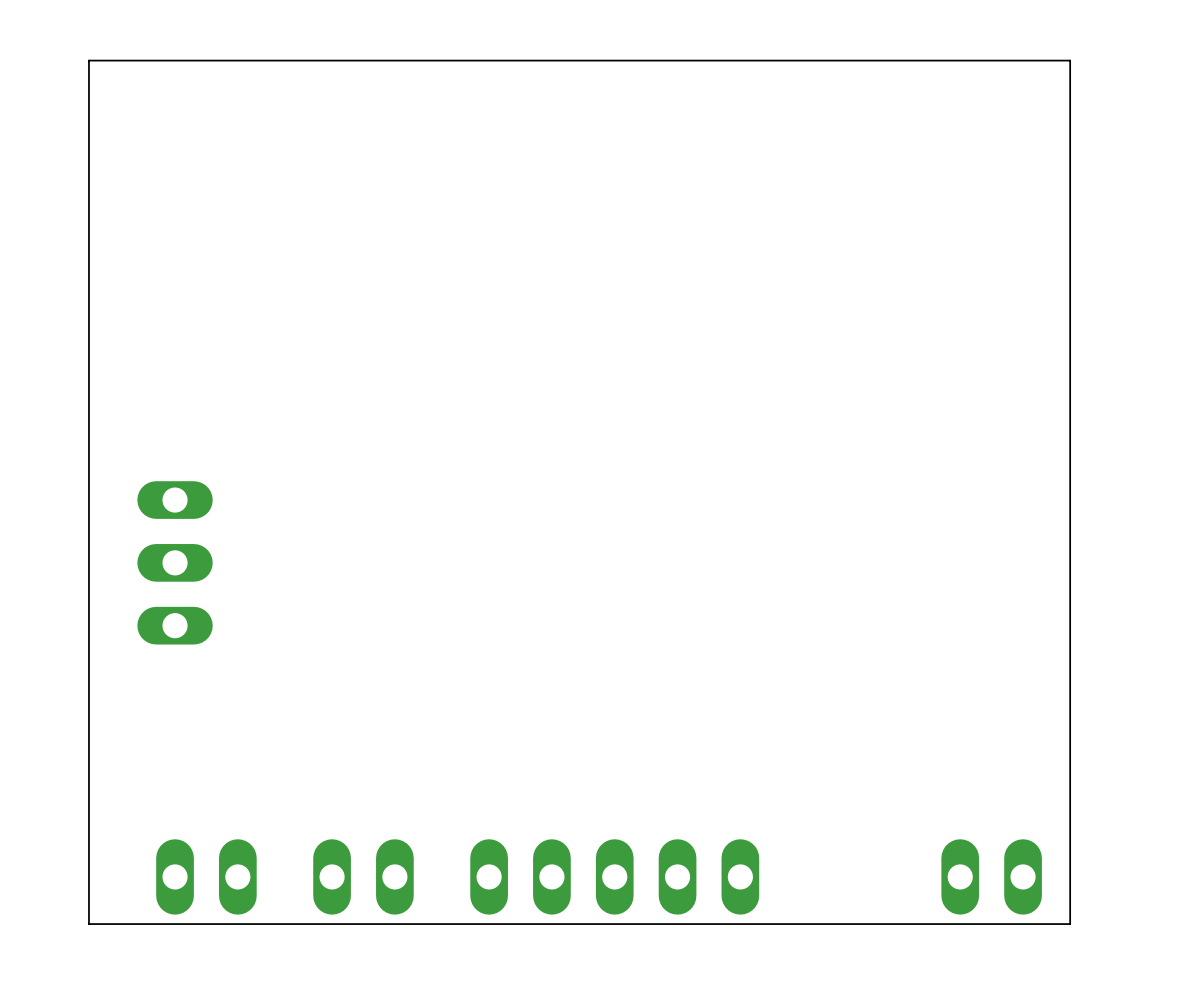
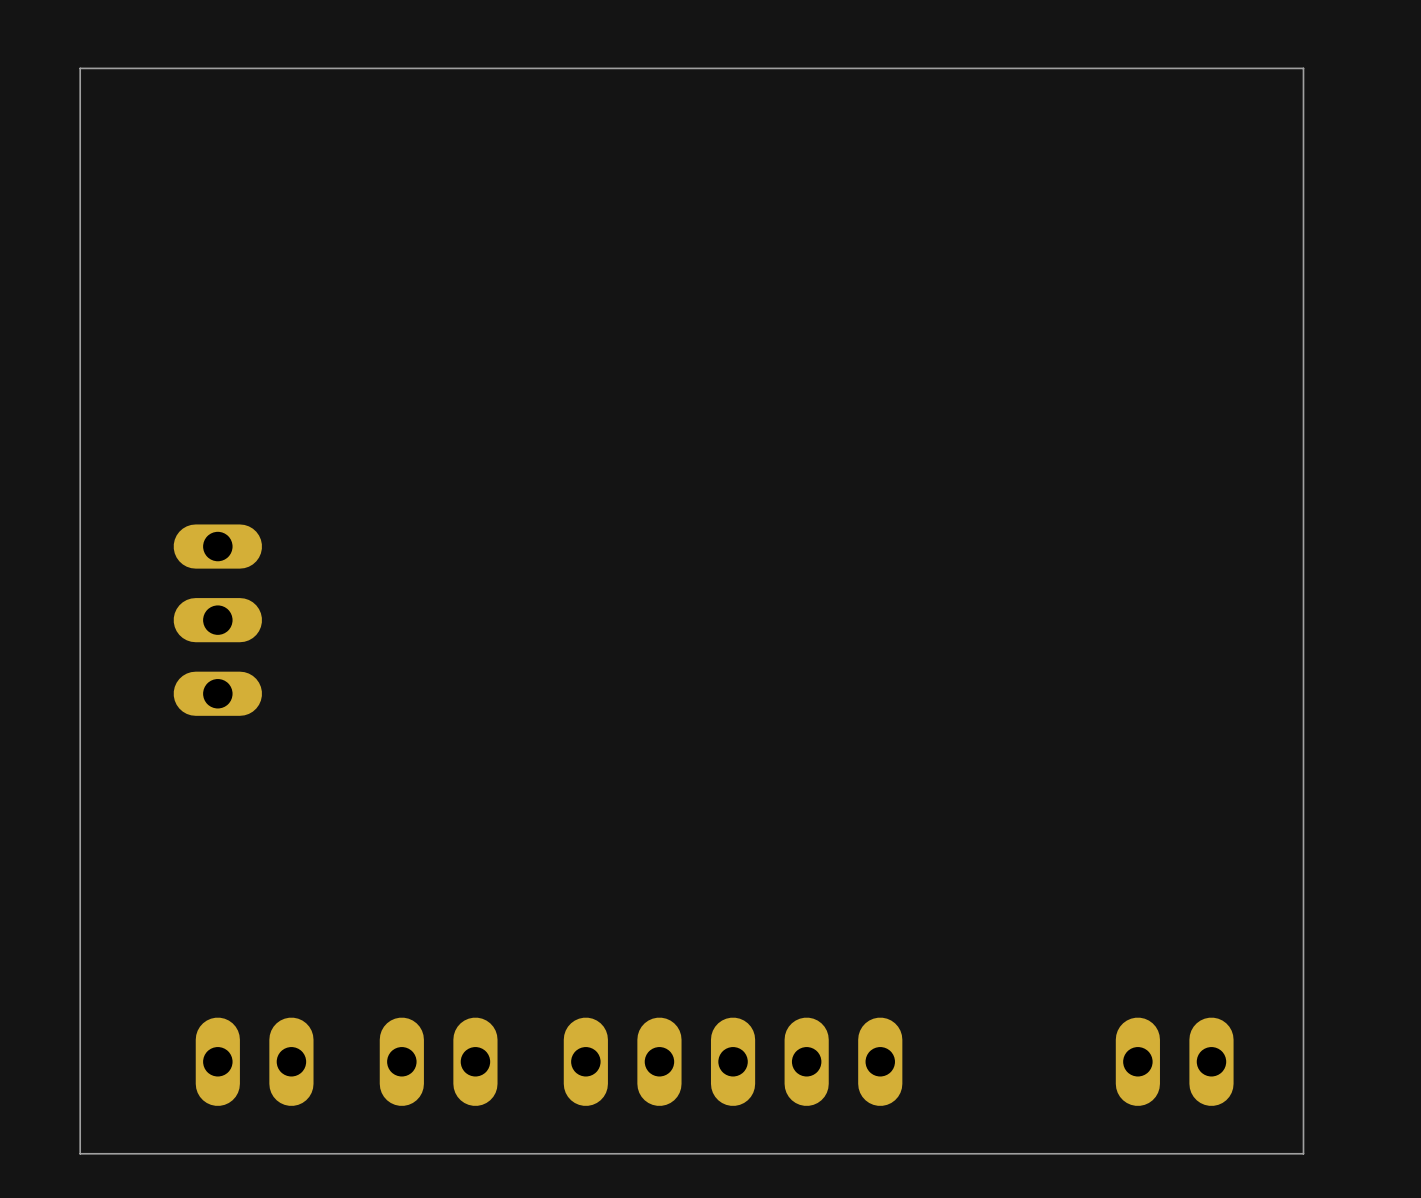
board edge: (1070, 60) (88, 60) (88, 924) (1070, 924) (1070, 60) -> (1303, 68) (1303, 1153) (80, 1153) (80, 68) (1303, 68)
part position: (175, 562) -> (217, 620)

